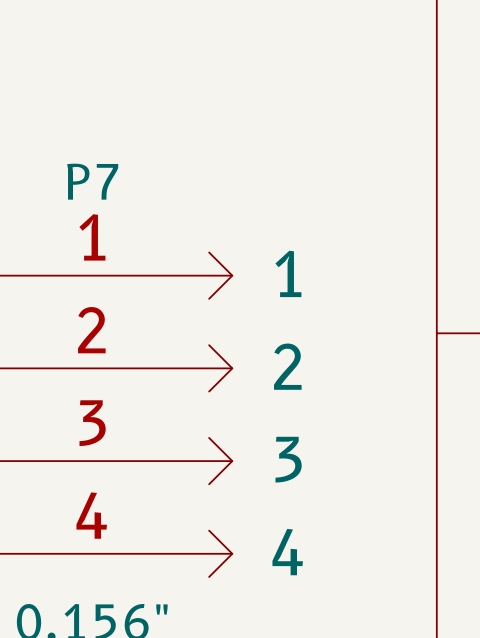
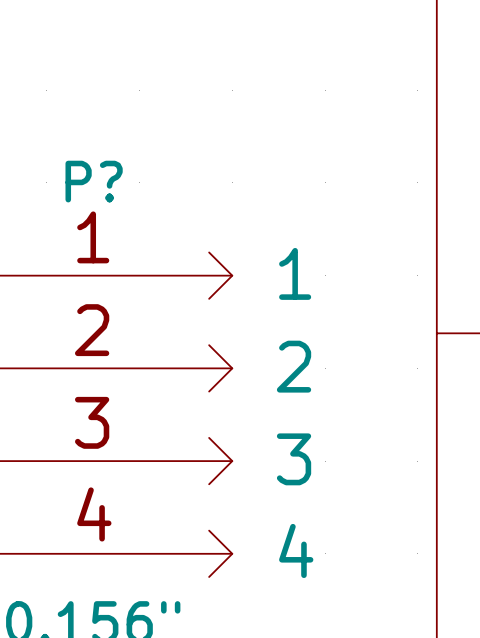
P7 name: P7 (92, 181) -> P? (94, 181)

